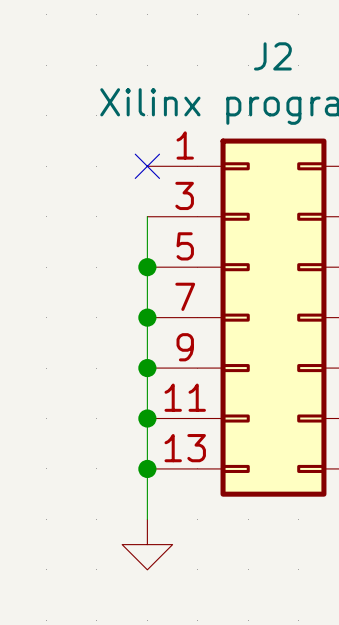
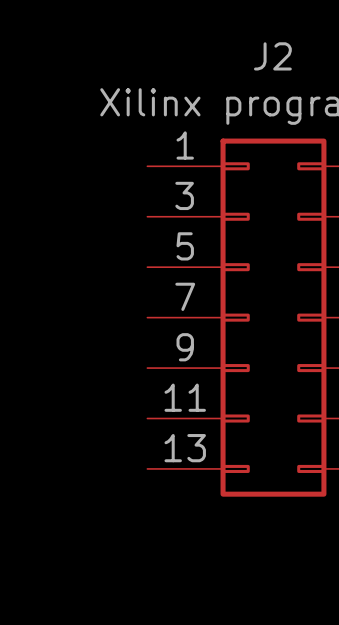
no-connect mark: (147, 166) -> none
wire: (147, 216) (147, 519) -> none
junction: (147, 267) -> none
junction: (147, 317) -> none
junction: (147, 368) -> none
junction: (147, 418) -> none
junction: (147, 468) -> none
power symbol: (147, 544) -> none

